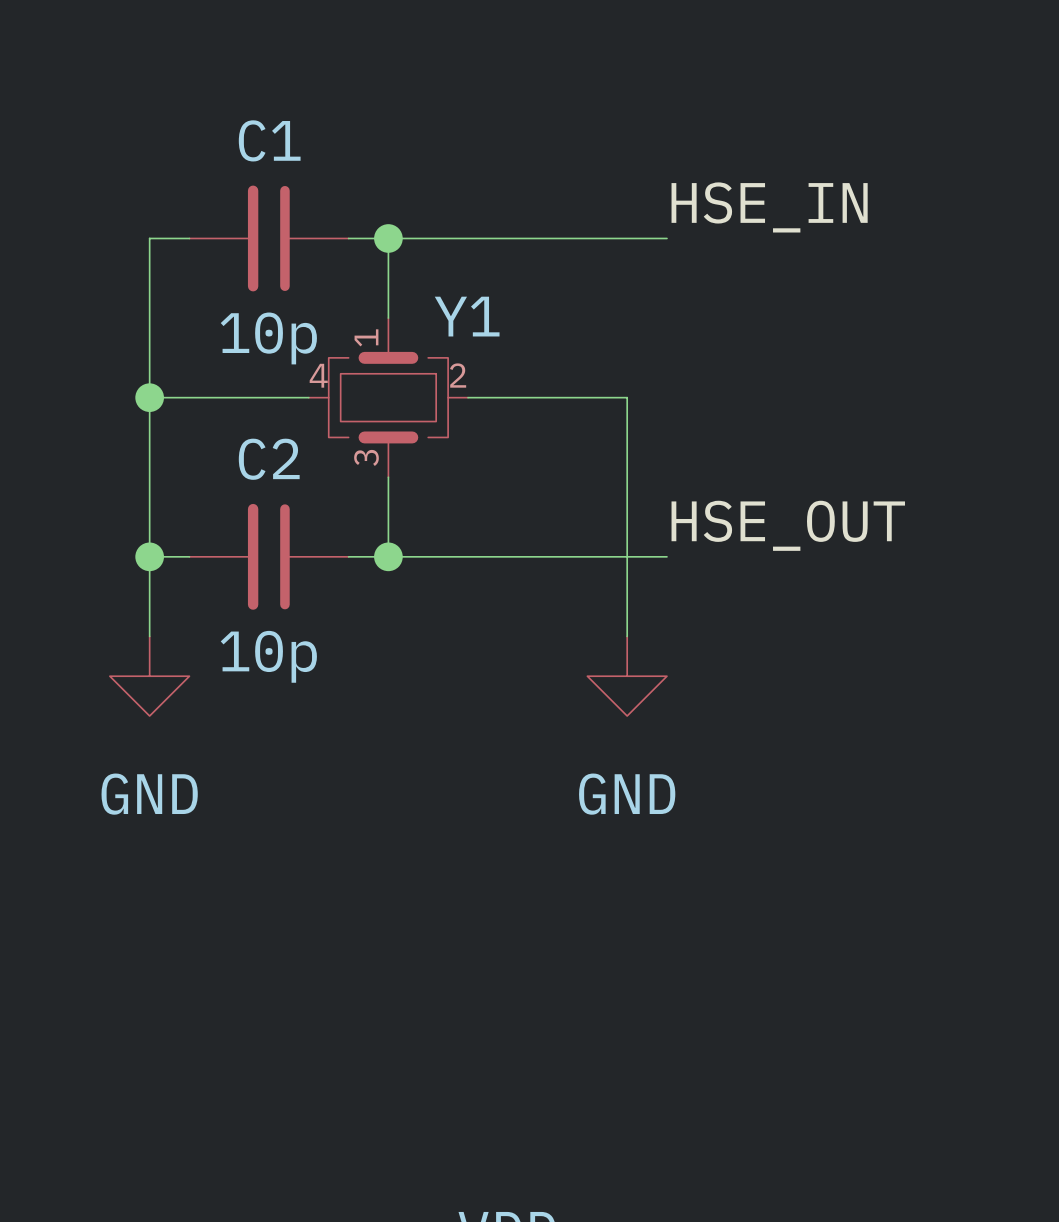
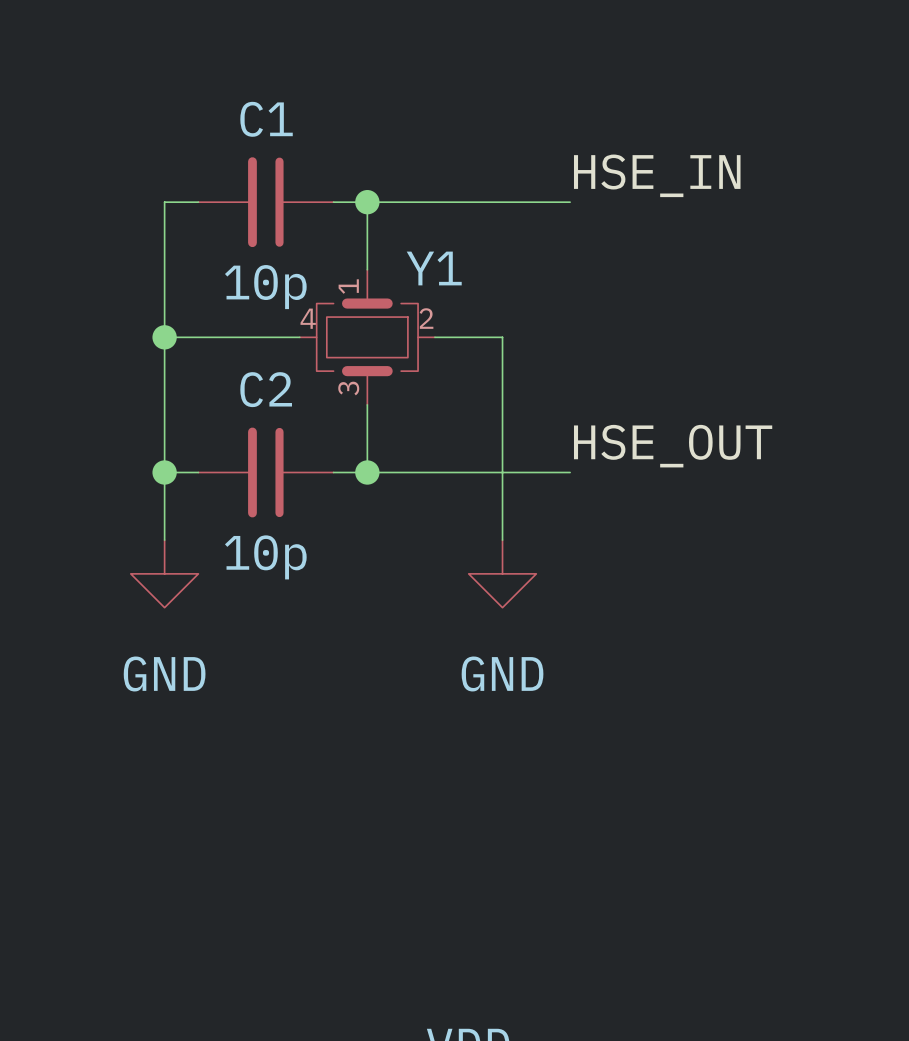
label position: HSE_IN (769, 207) -> HSE_IN (657, 175)
wire: (627, 238) (666, 238) -> none
wire: (547, 397) (627, 397) (627, 636) -> (502, 337) (502, 540)
label position: HSE_OUT (788, 525) -> HSE_OUT (673, 446)
wire: (627, 556) (666, 556) -> none
power symbol position: GND (627, 676) -> GND (502, 573)

